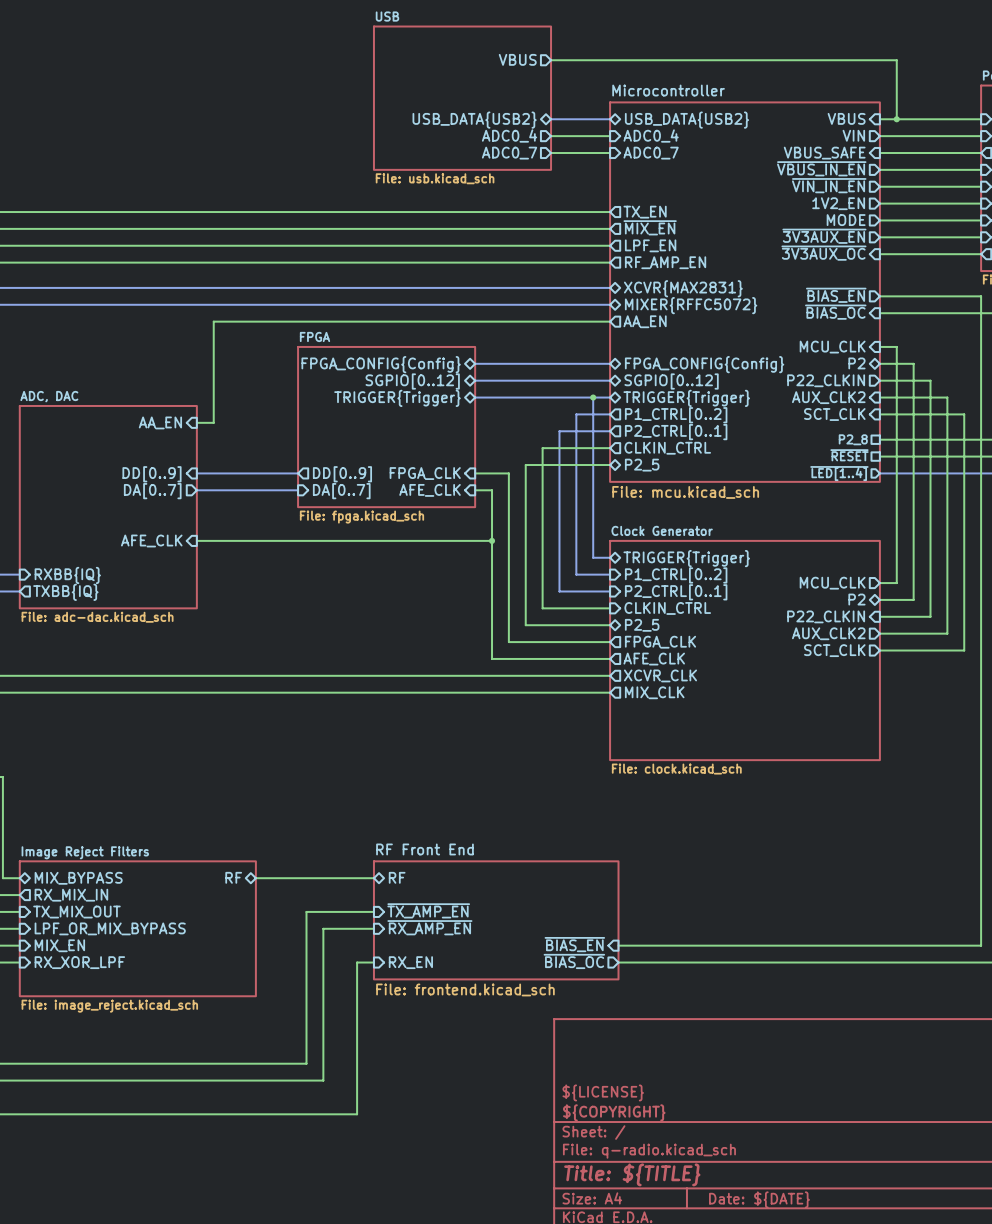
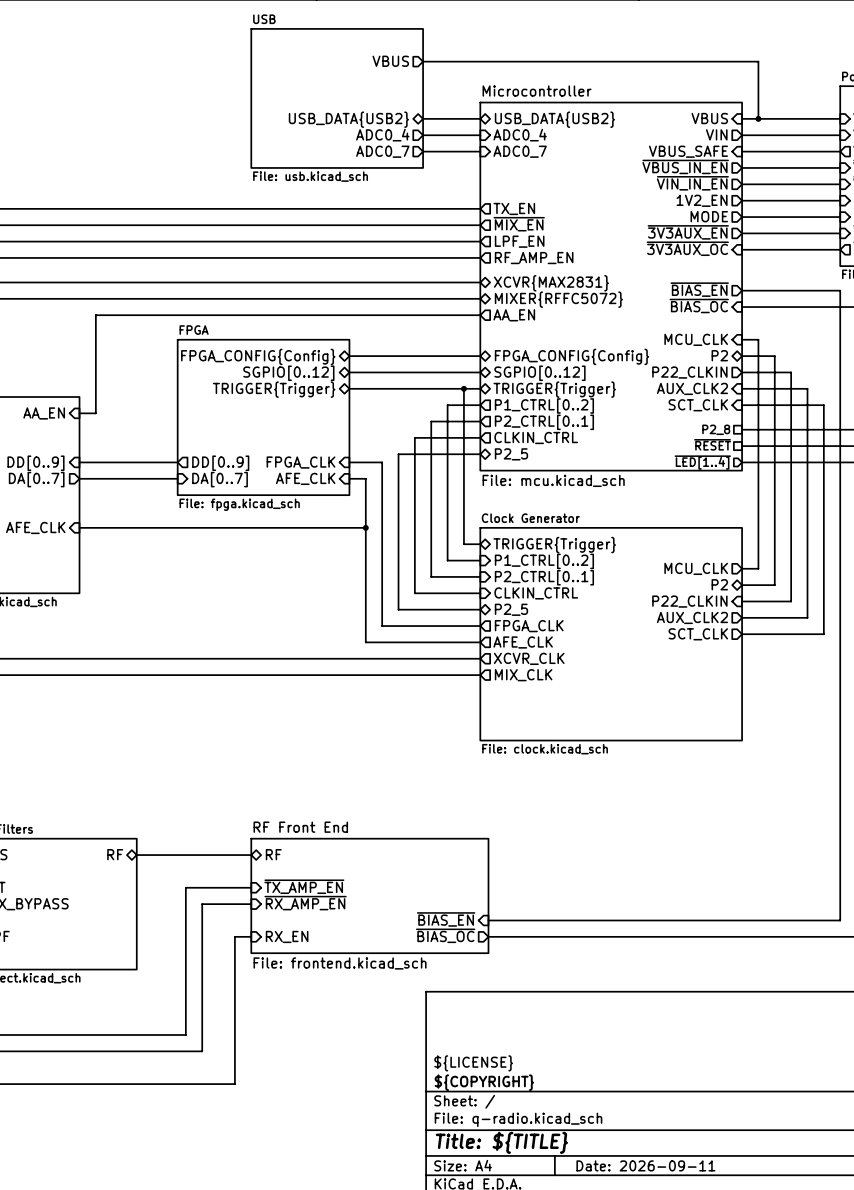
title block: Date: ${DATE} (759, 1199) -> Date: 2026-09-11 (645, 1165)

